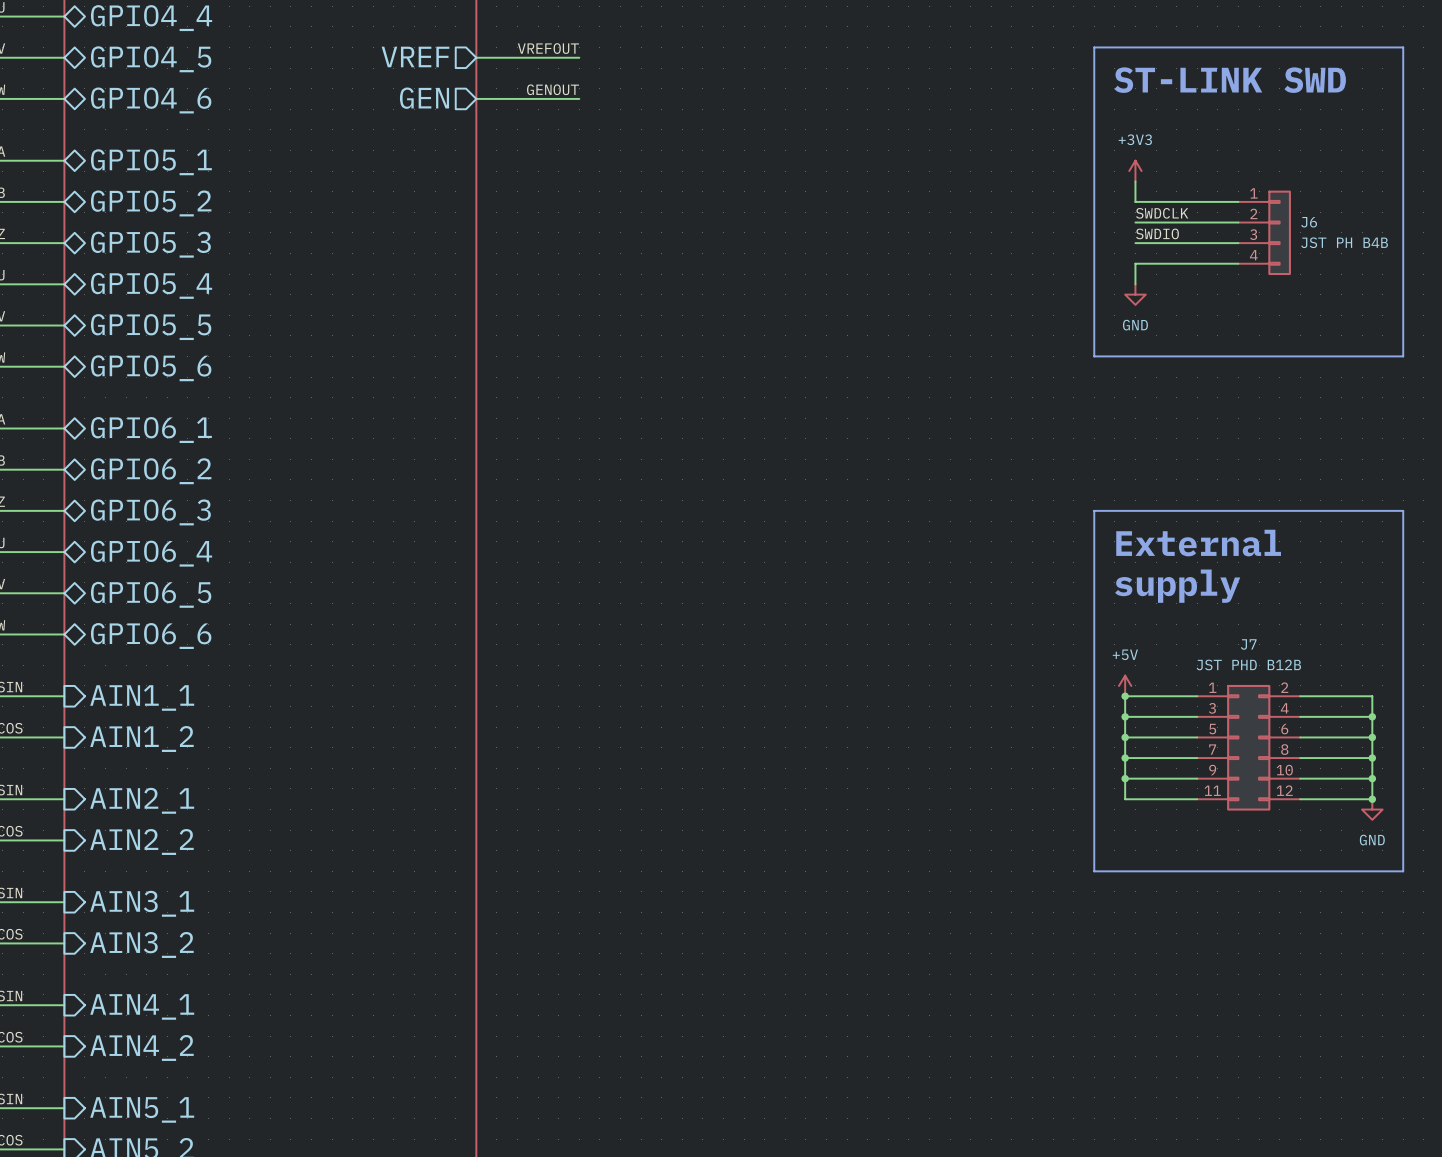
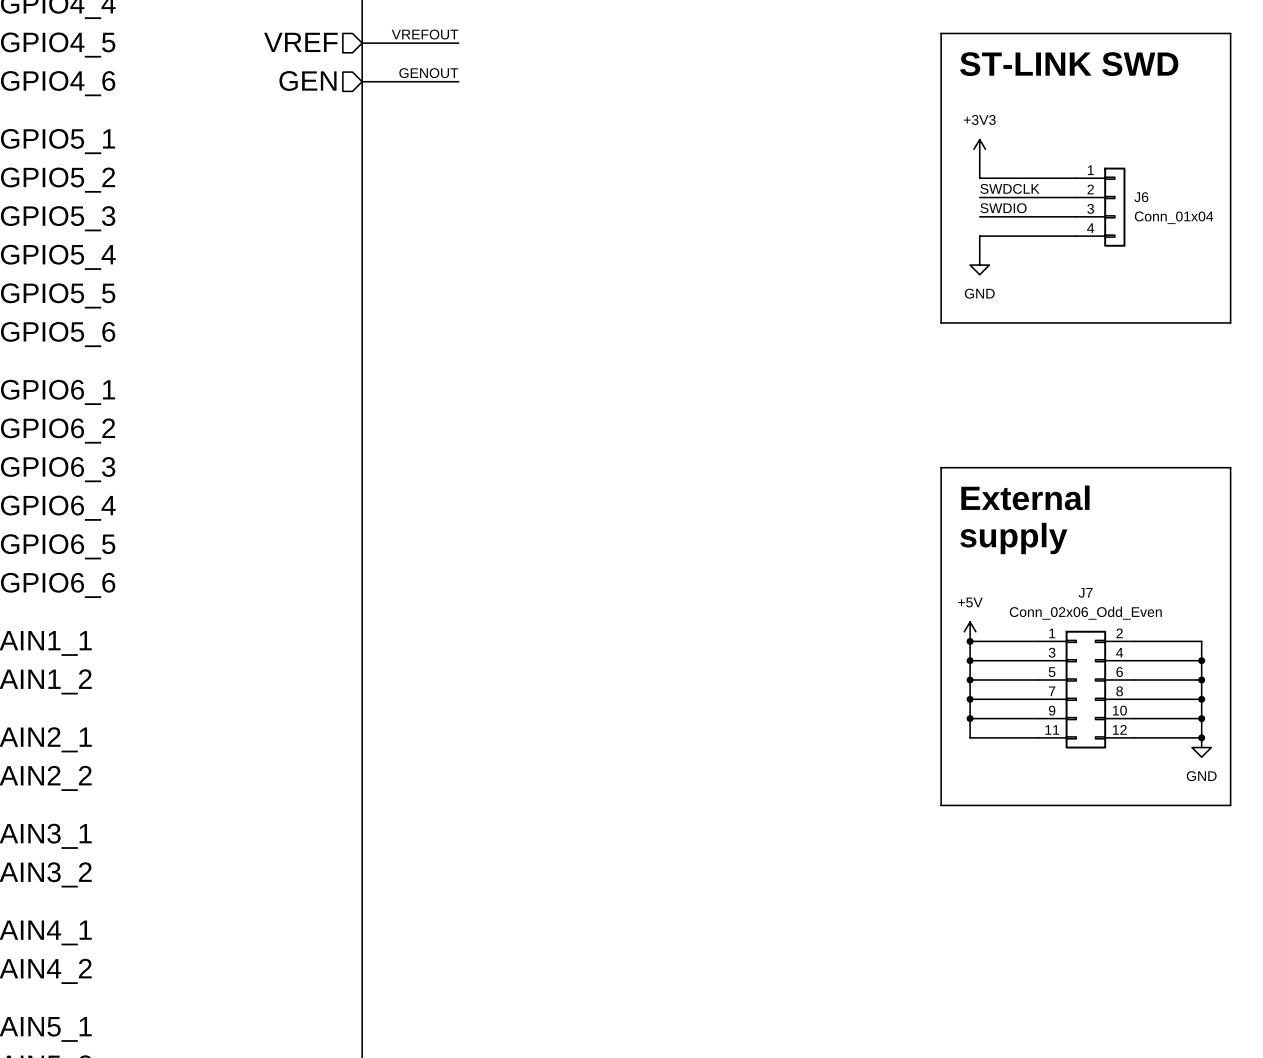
J6 value: JST PH B4B (1344, 242) -> Conn_01x04 (1174, 217)
J7 value: JST PHD B12B (1248, 664) -> Conn_02x06_Odd_Even (1085, 613)

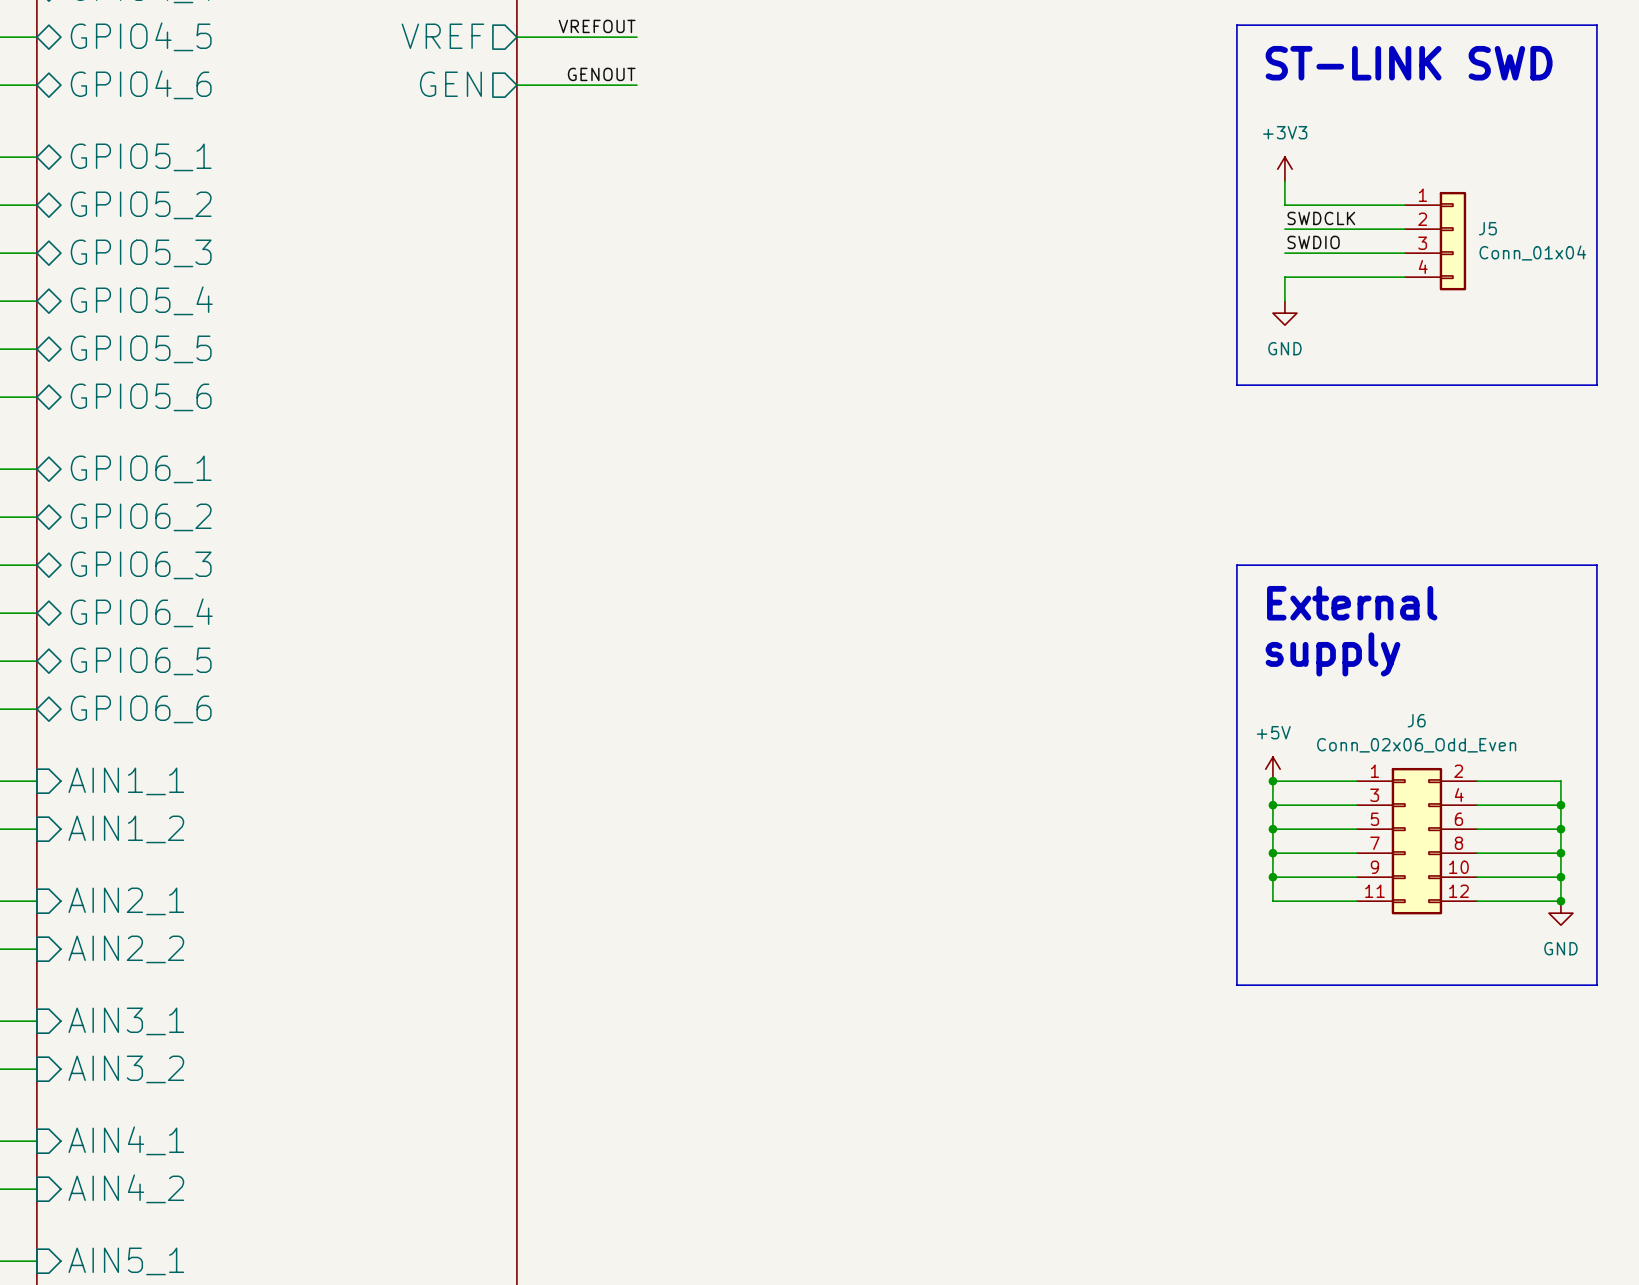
J6 name: J6 (1141, 197) -> J5 (1487, 228)
J7 name: J7 (1085, 592) -> J6 (1416, 720)

